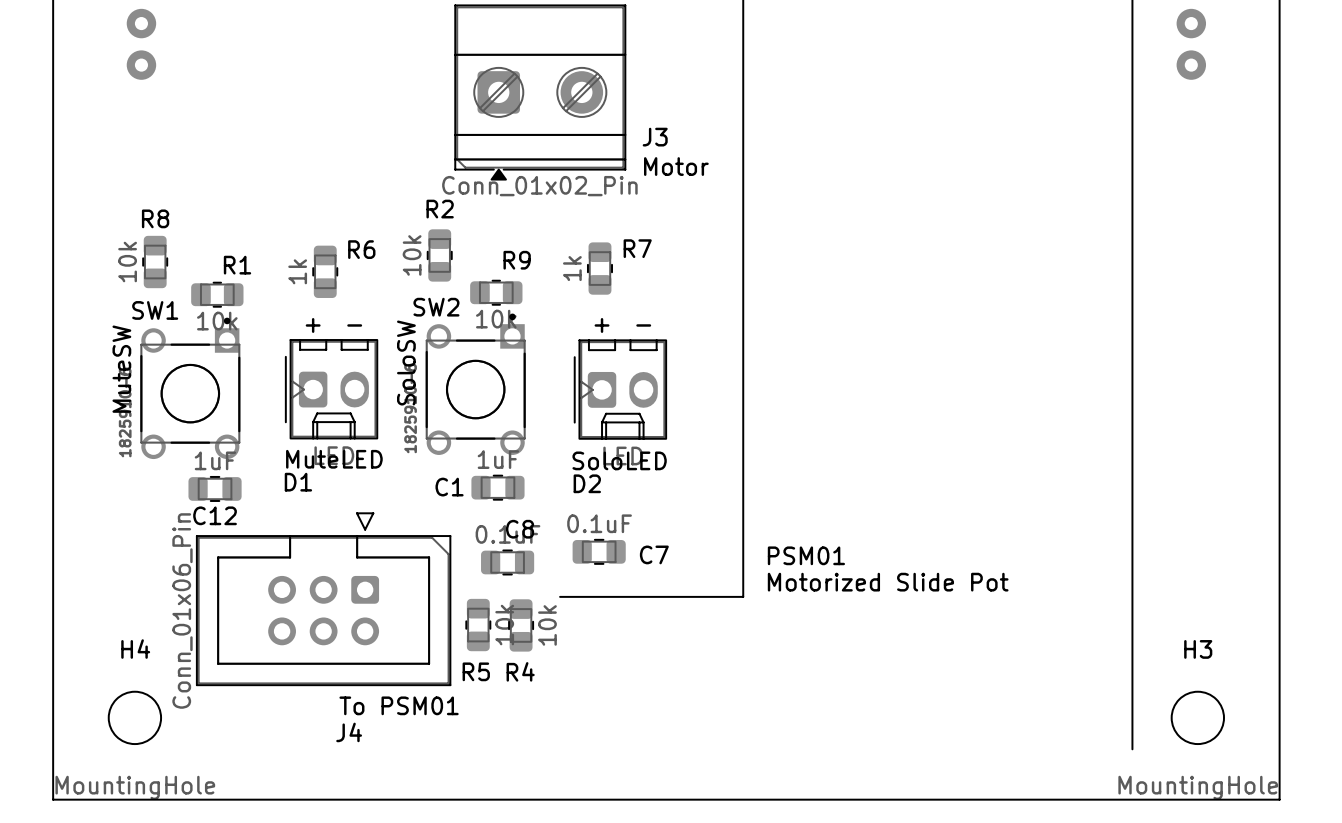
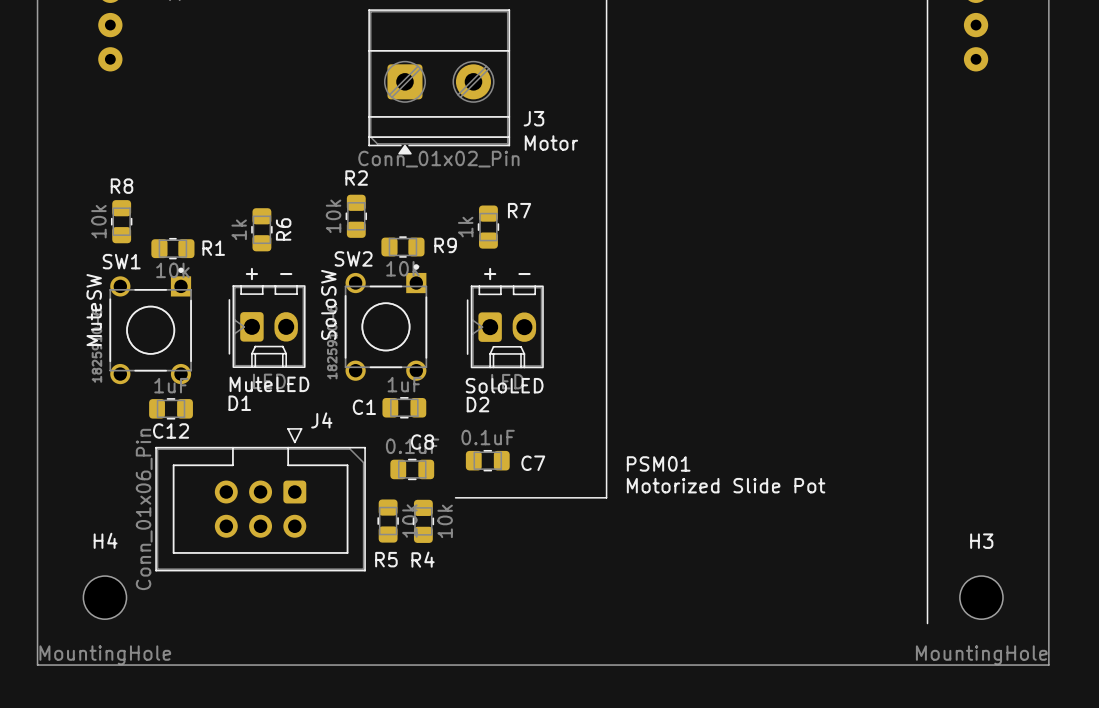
R6 name rotation: 0° (361, 249) -> 90° counterclockwise (283, 229)
R9 name position: R9 (517, 260) -> R9 (445, 245)
R1 name position: R1 (237, 265) -> R1 (213, 248)
J4 text: To PSM01 (399, 705) -> none
J4 name position: J4 (349, 732) -> J4 (321, 420)

